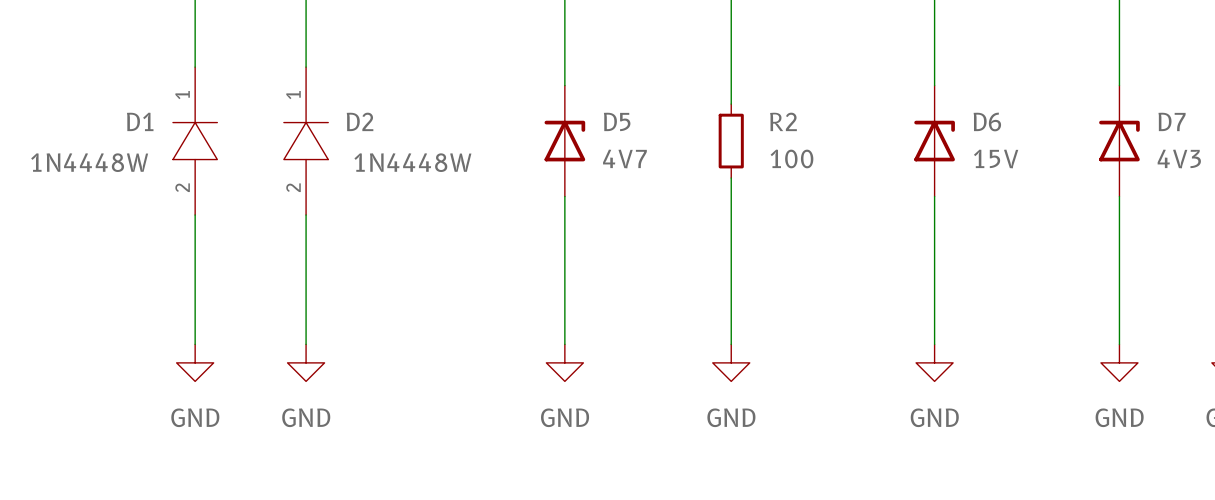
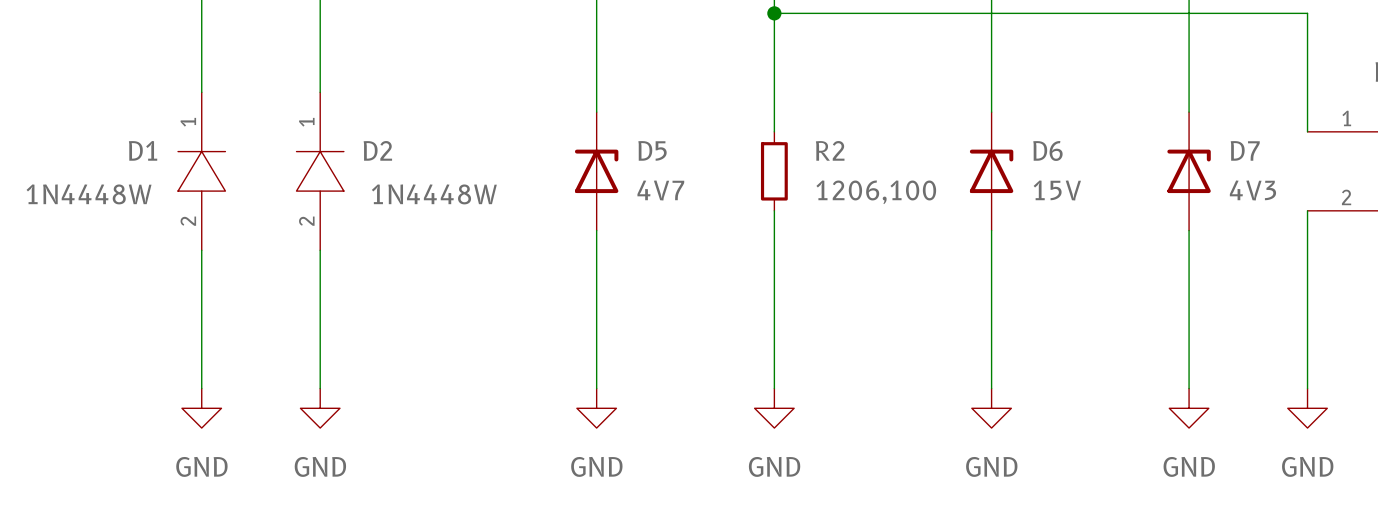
R2 value: 100 (791, 158) -> 1206,100 (876, 192)

